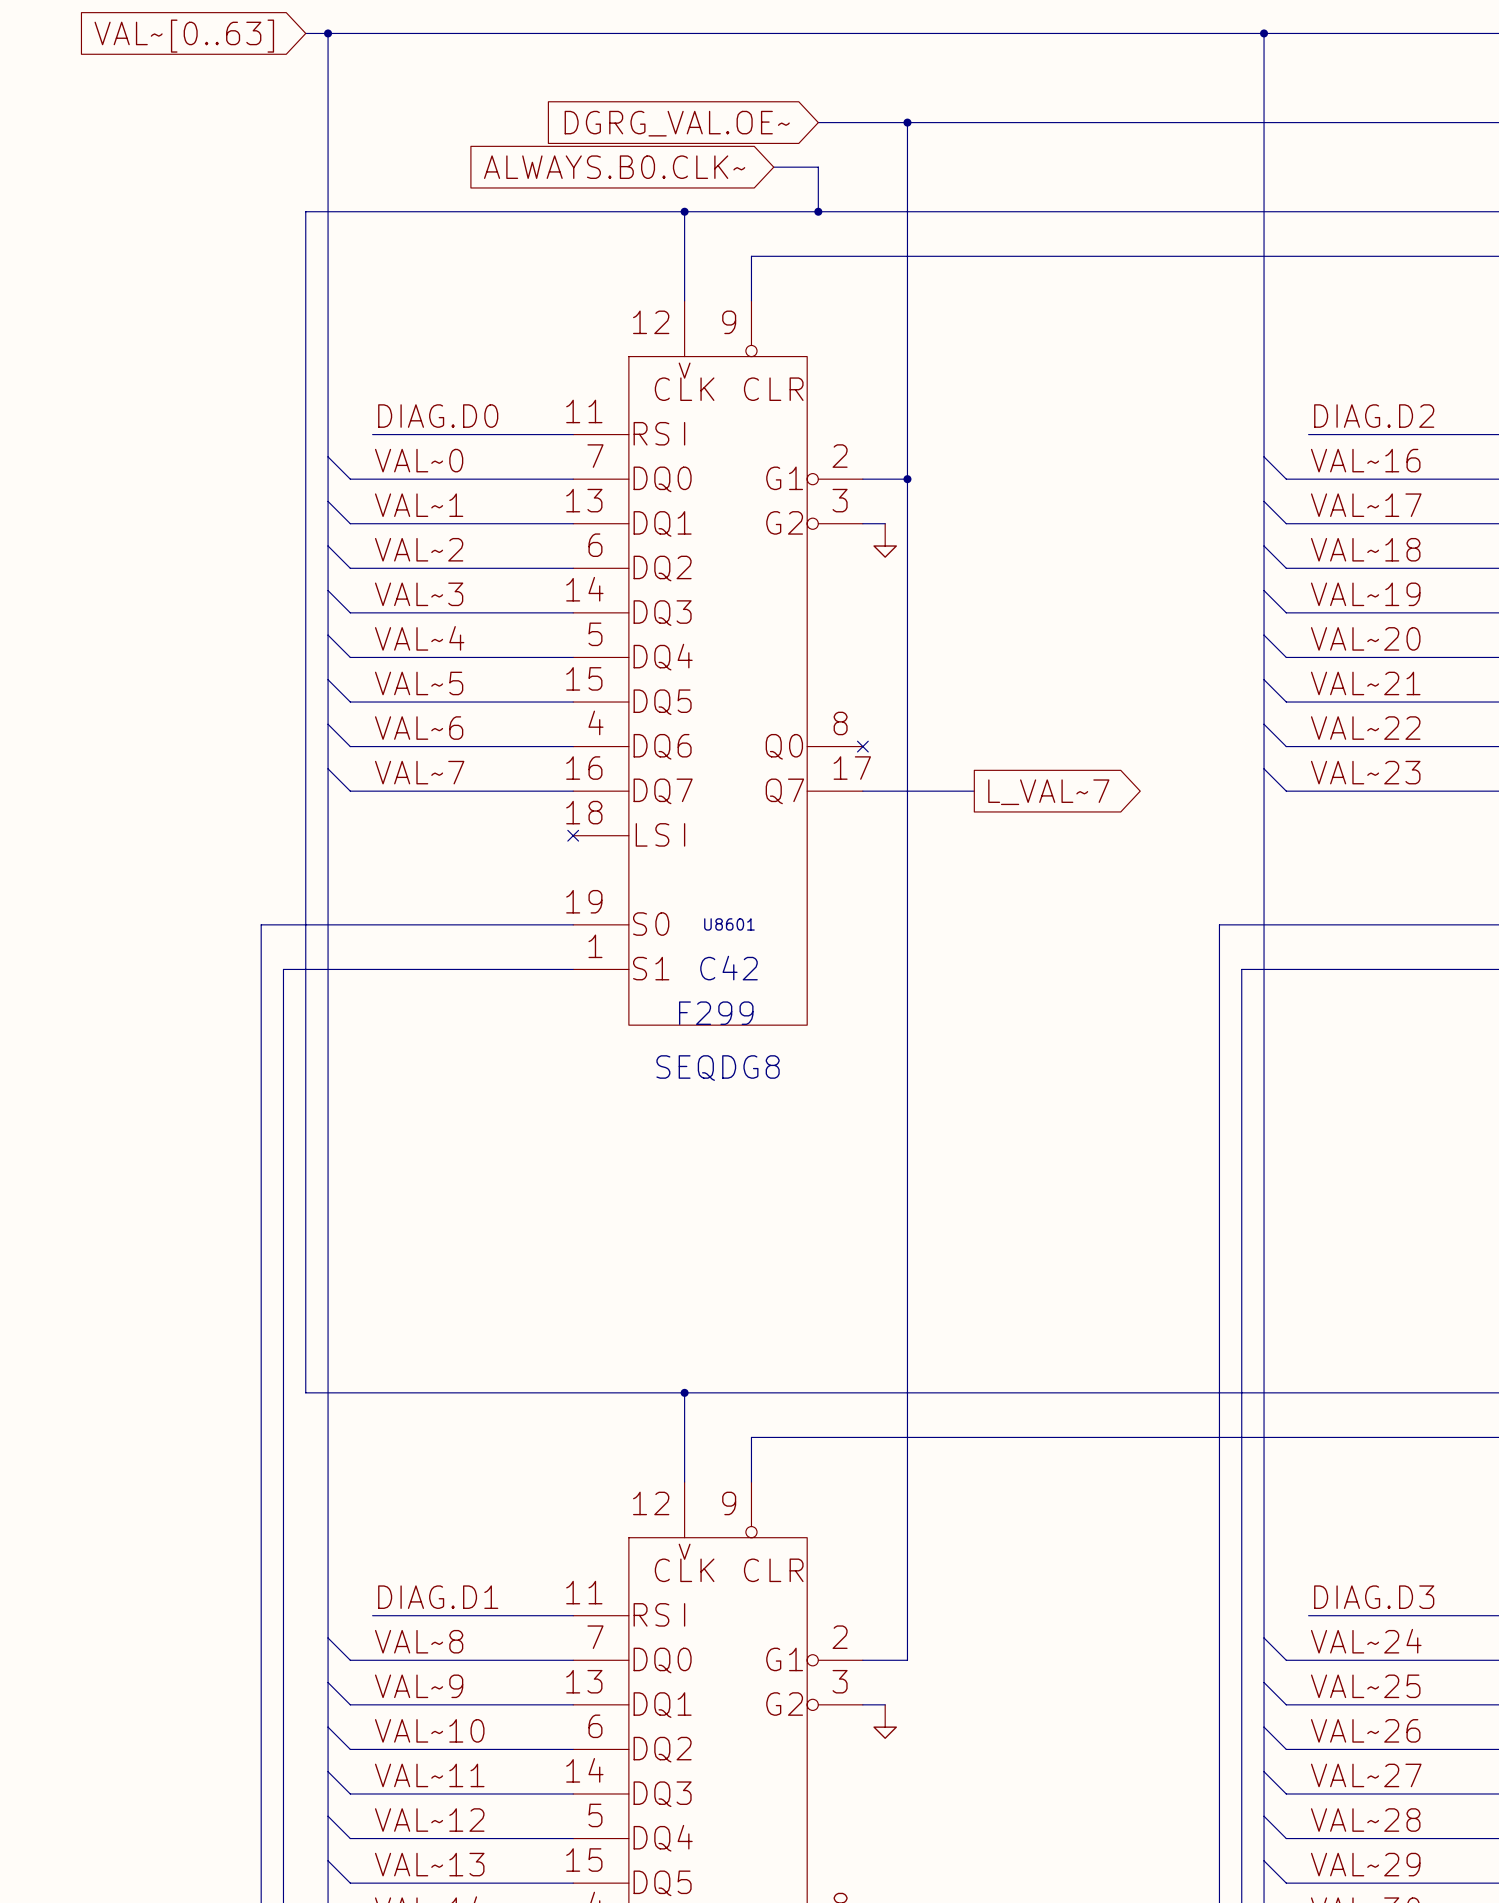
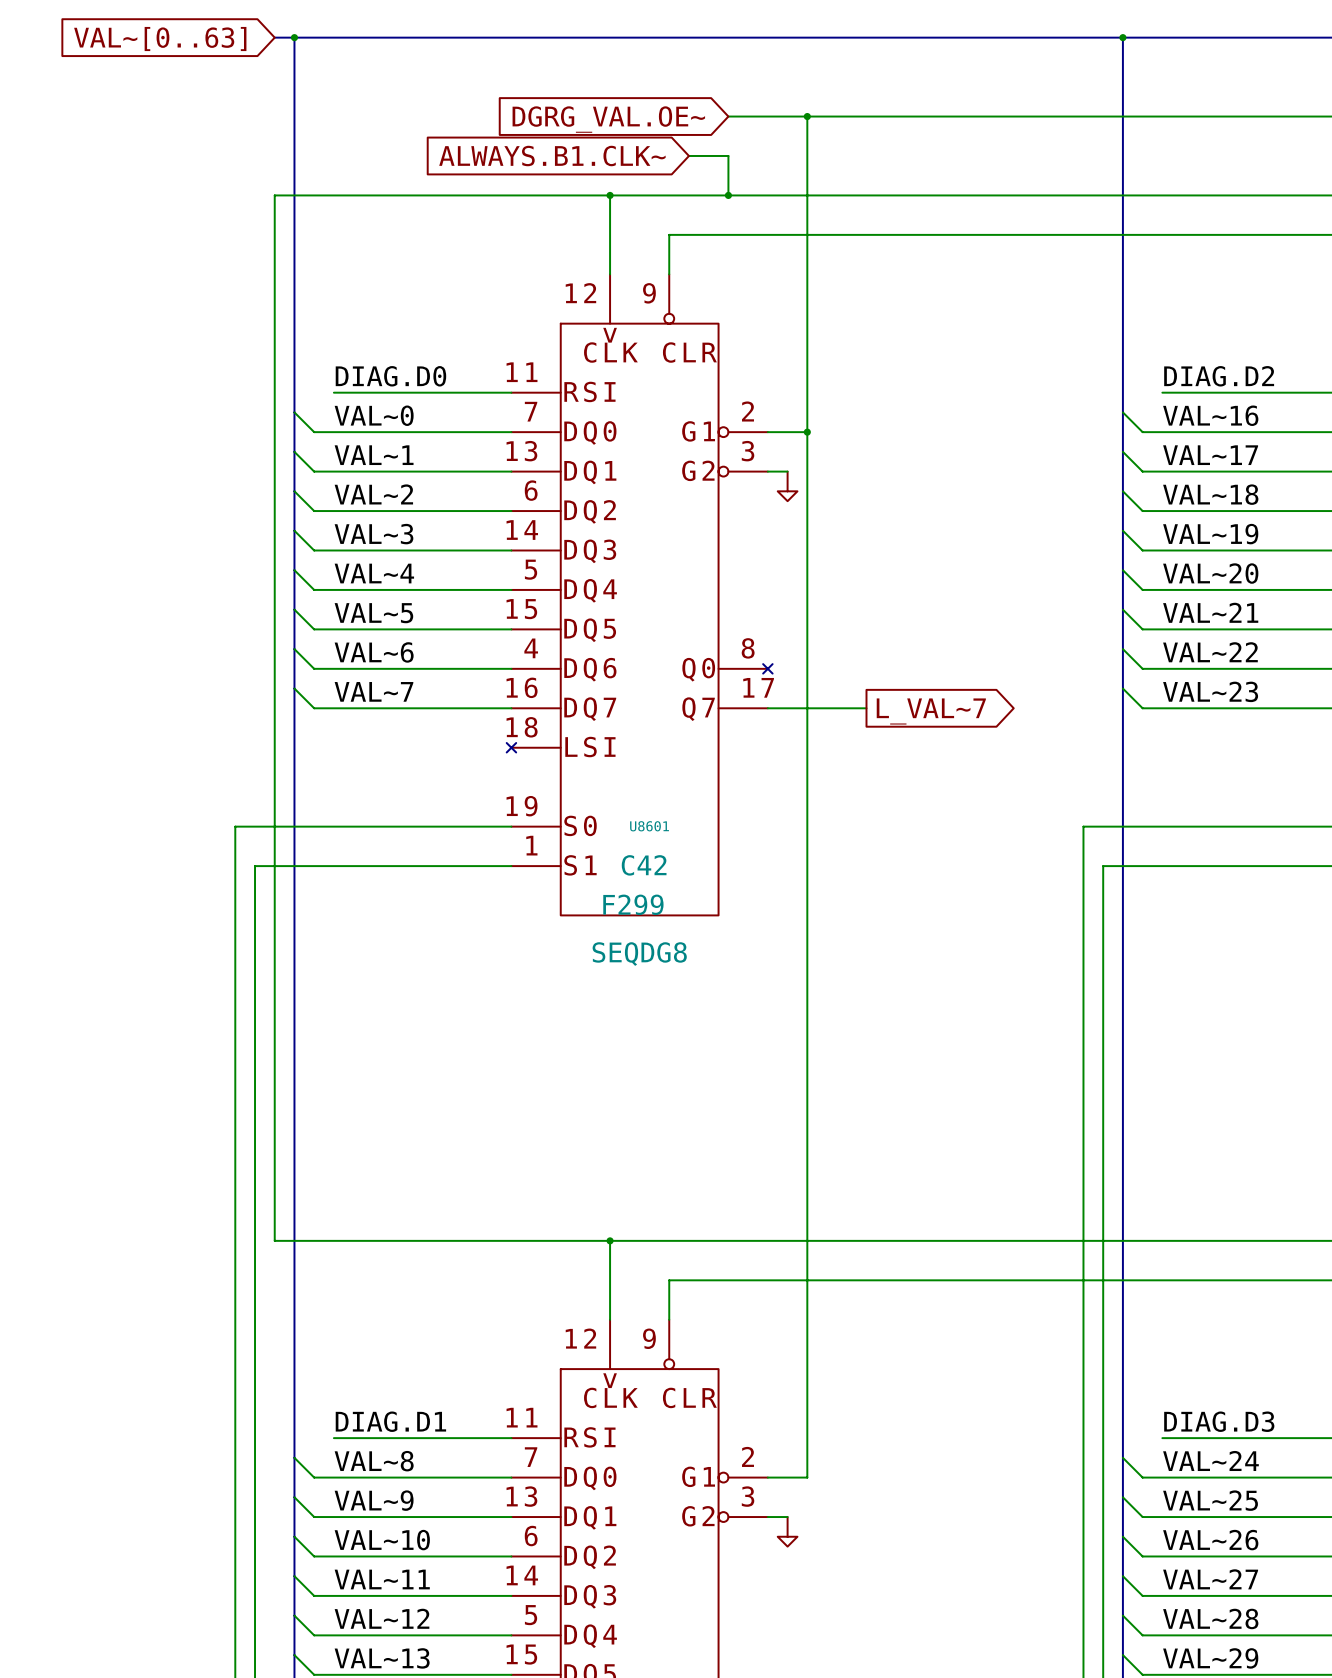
global label: ALWAYS.B0.CLK~ (614, 167) -> ALWAYS.B1.CLK~ (552, 156)

